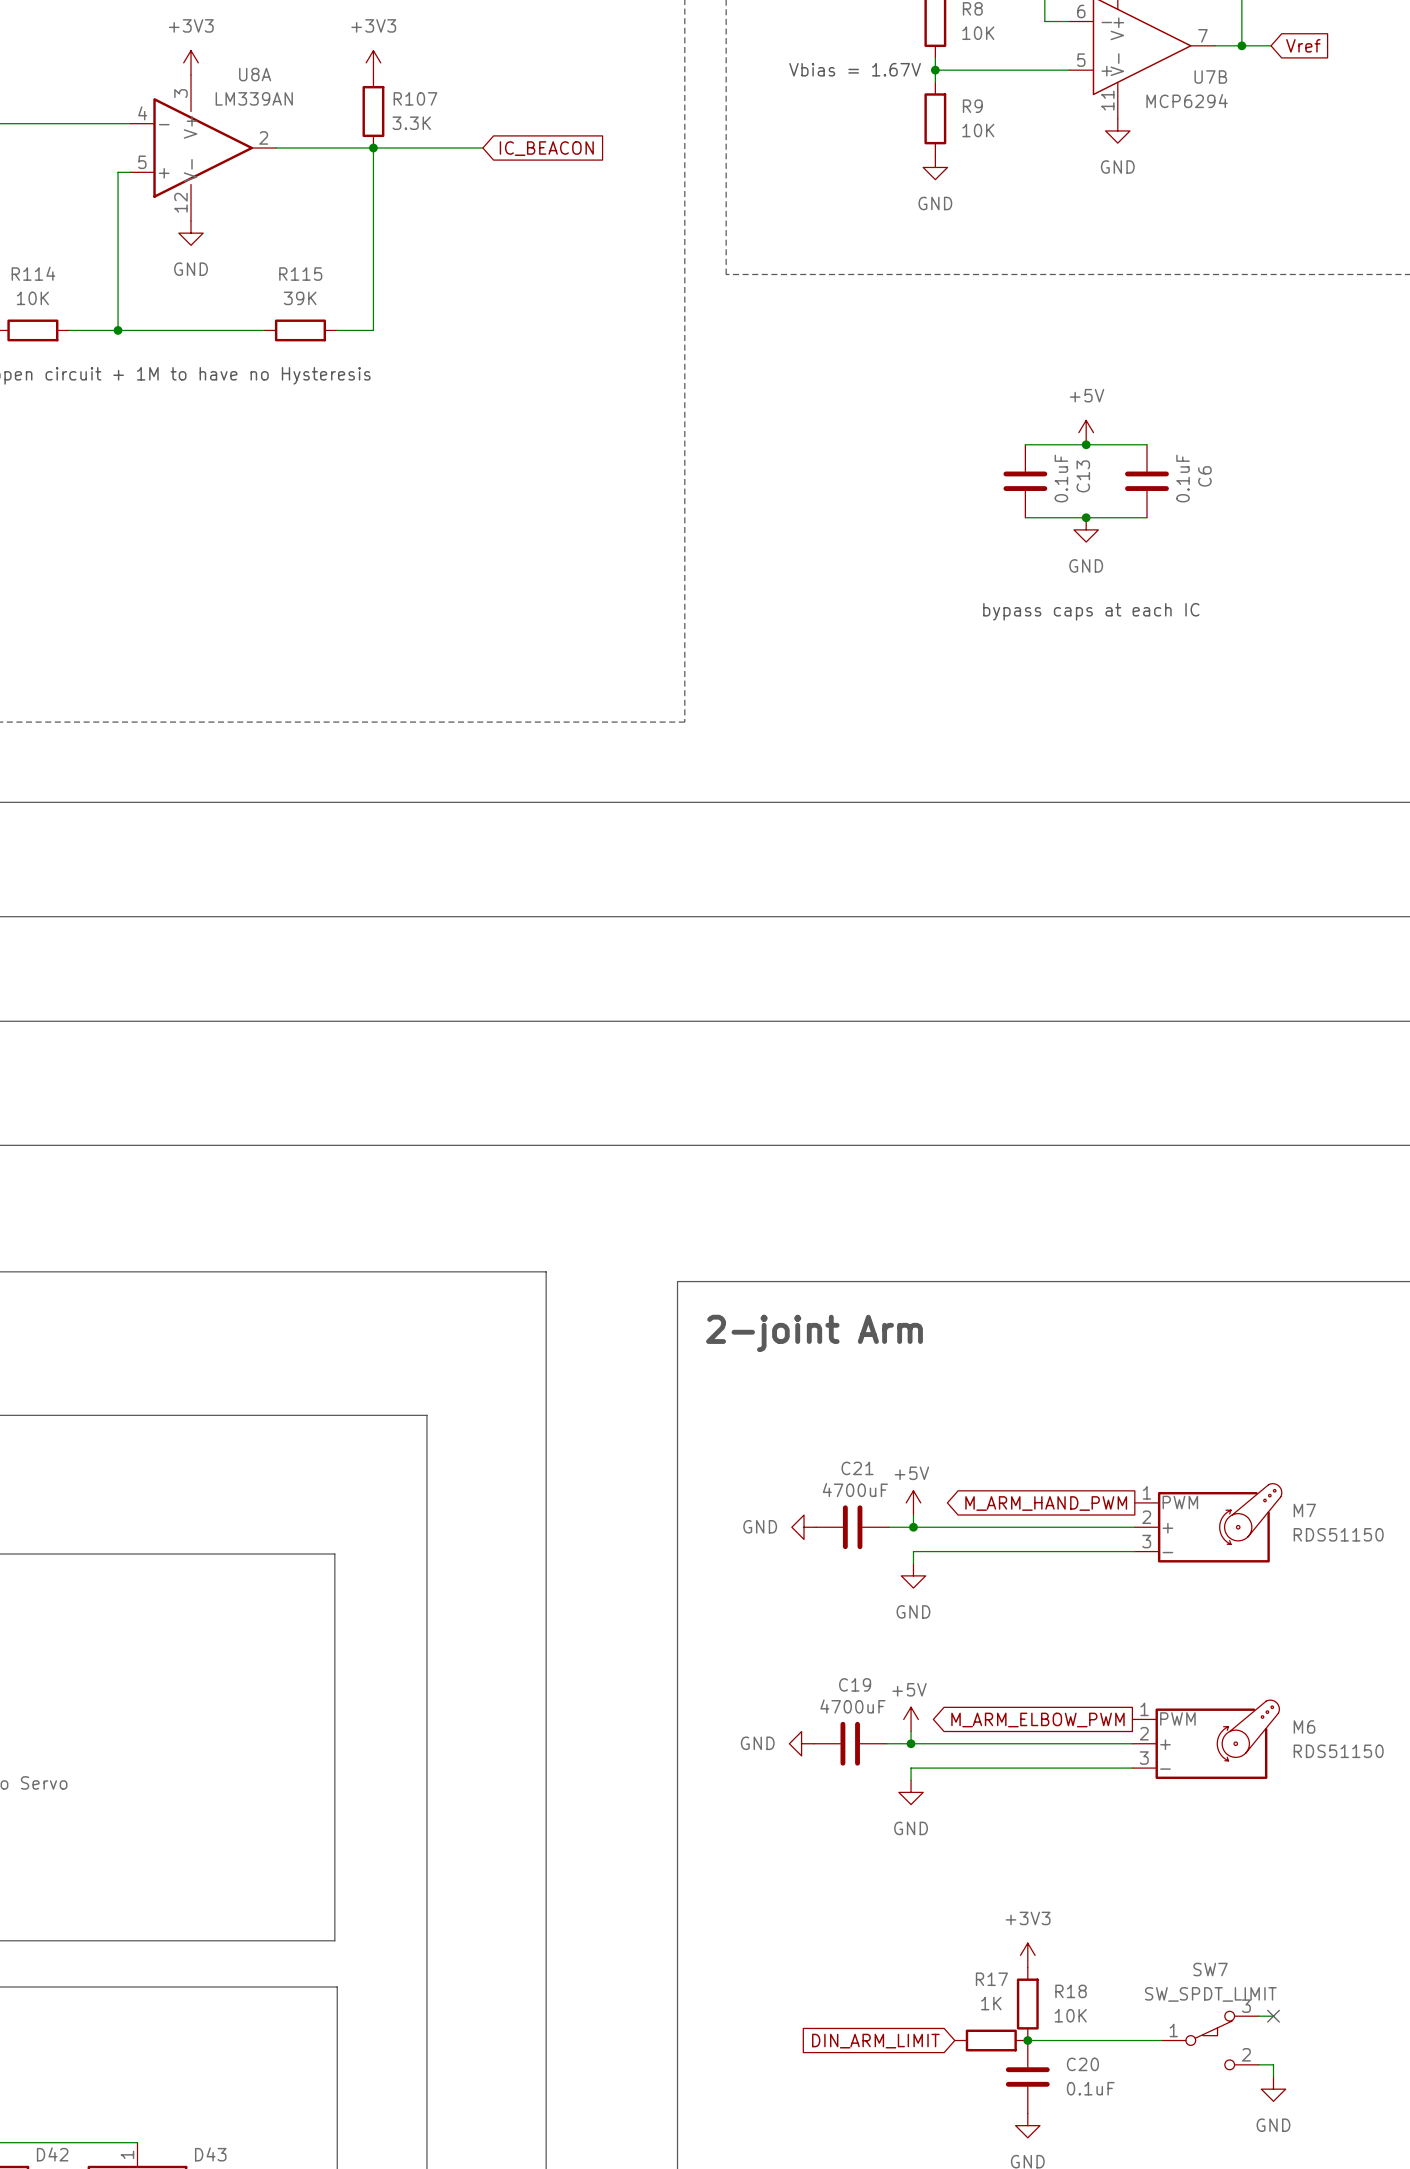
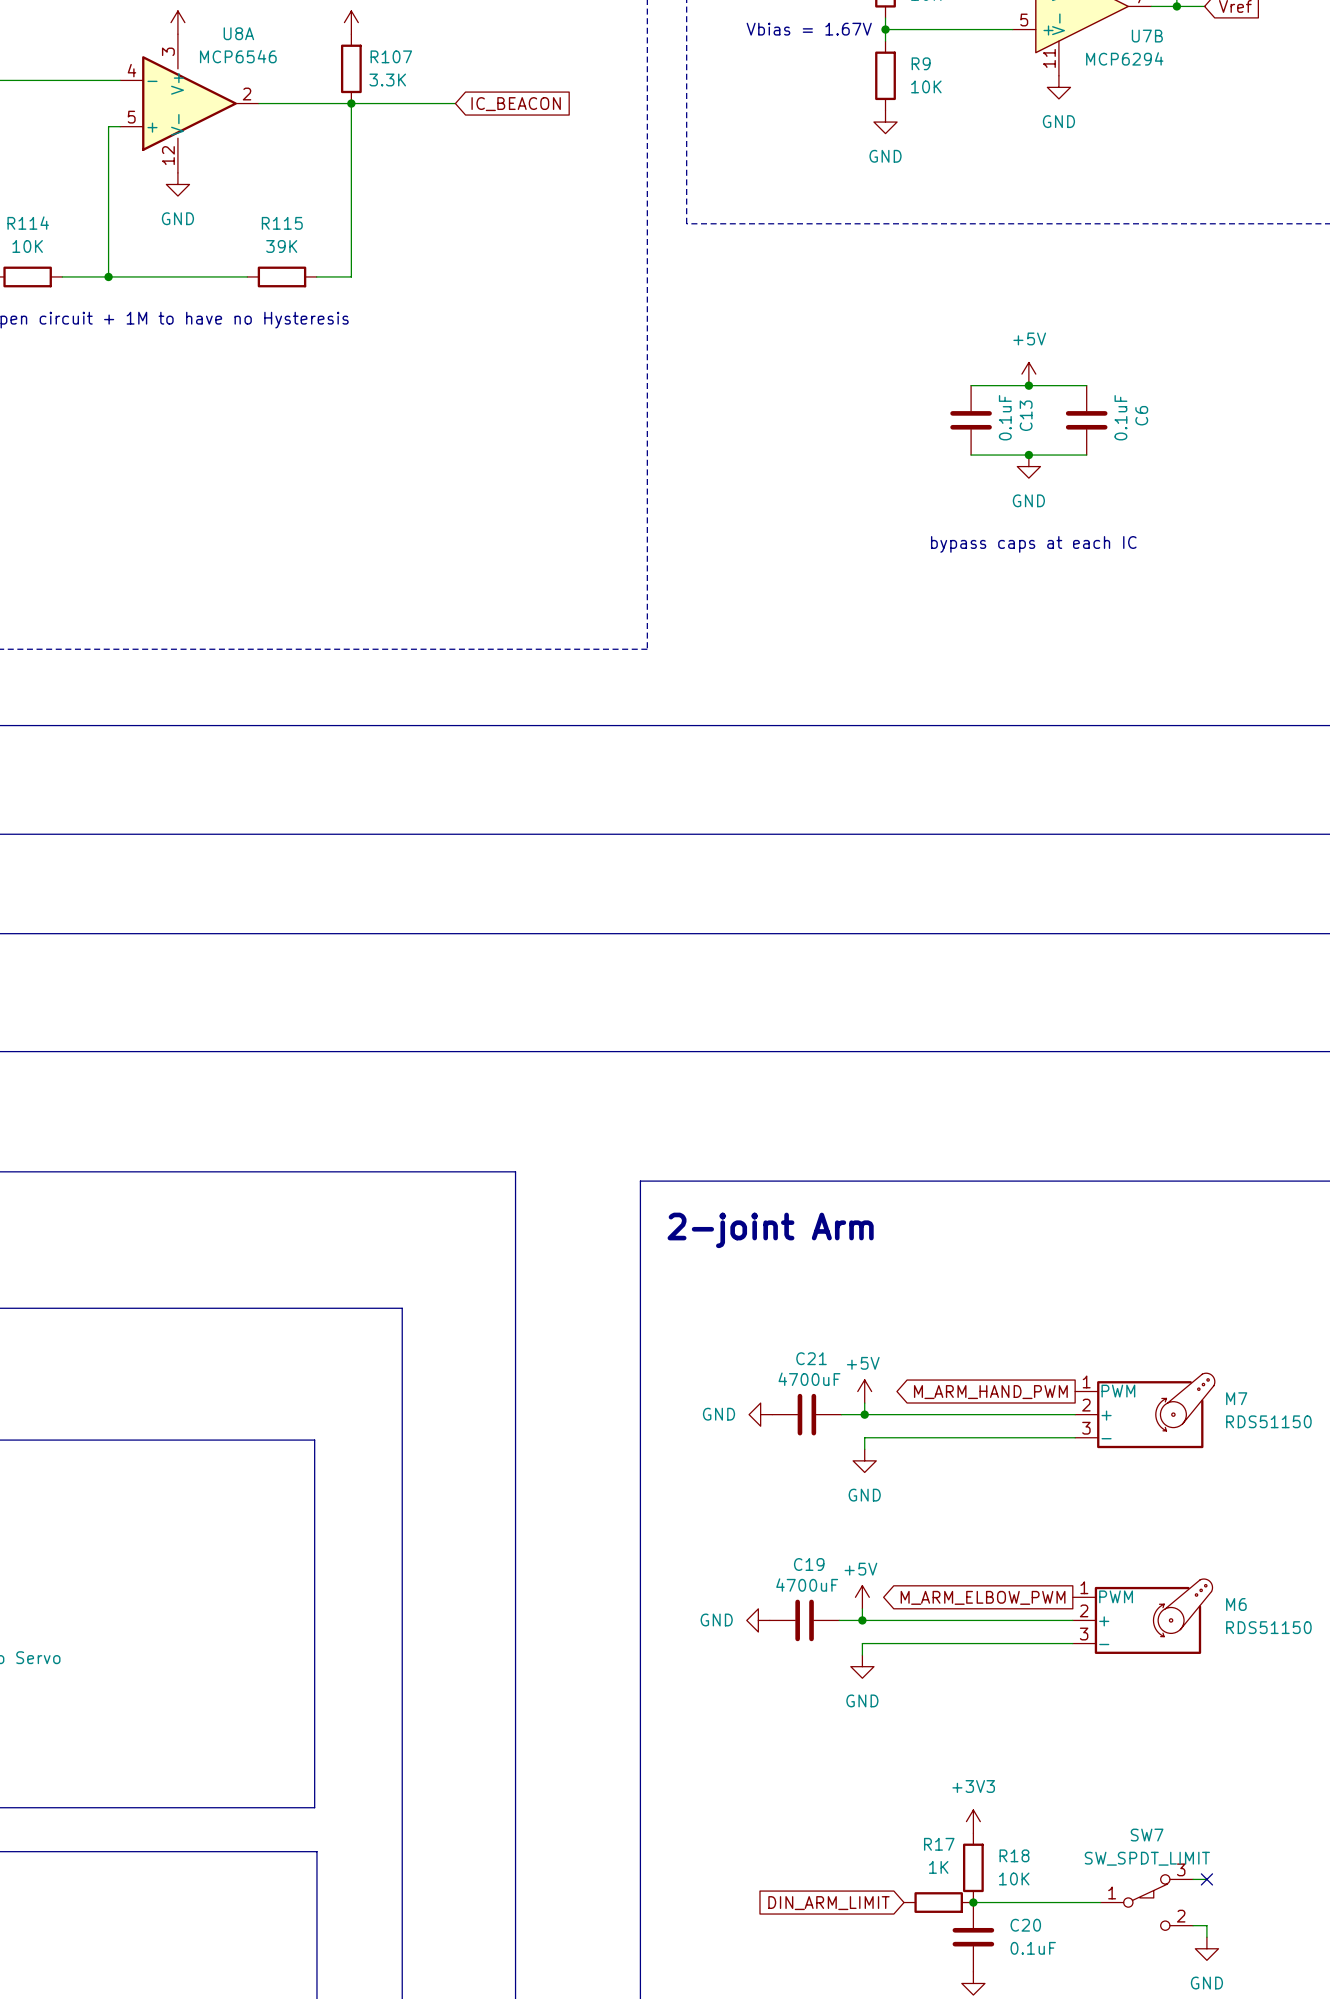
U8A value: LM339AN (254, 98) -> MCP6546 (238, 56)

